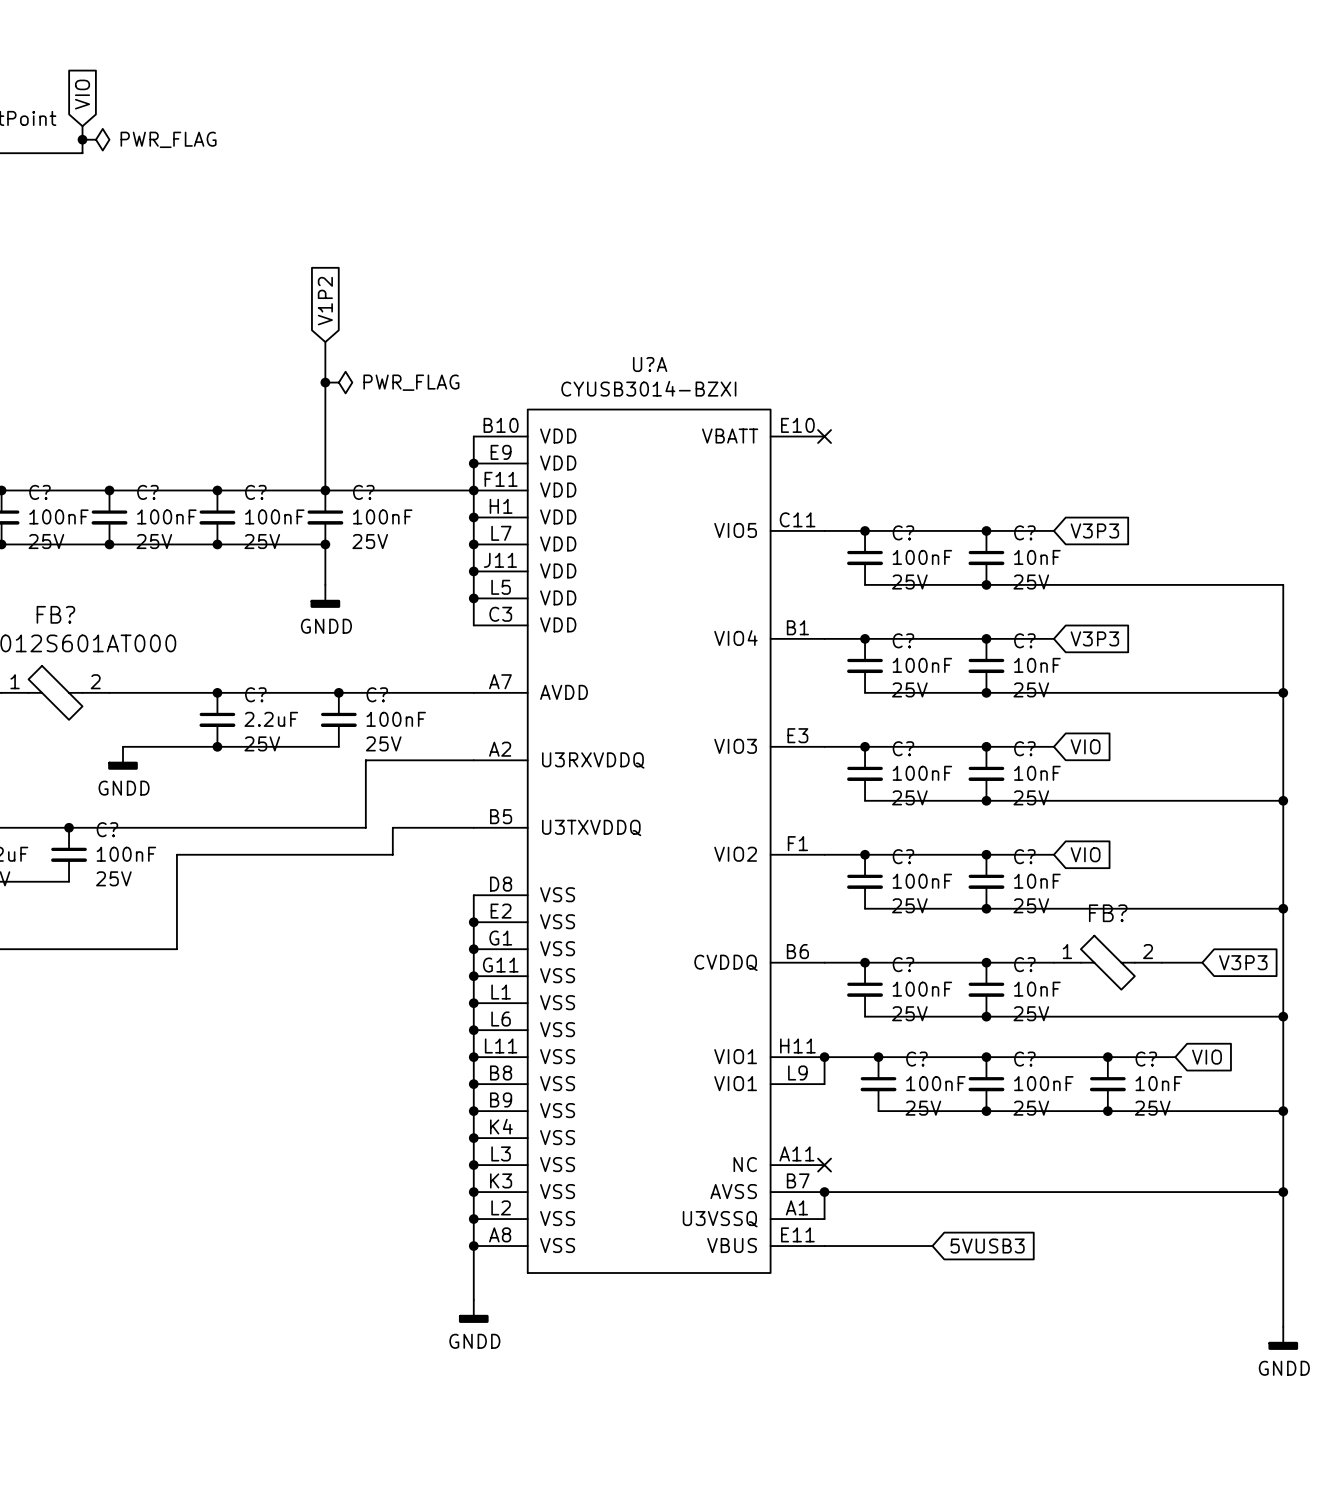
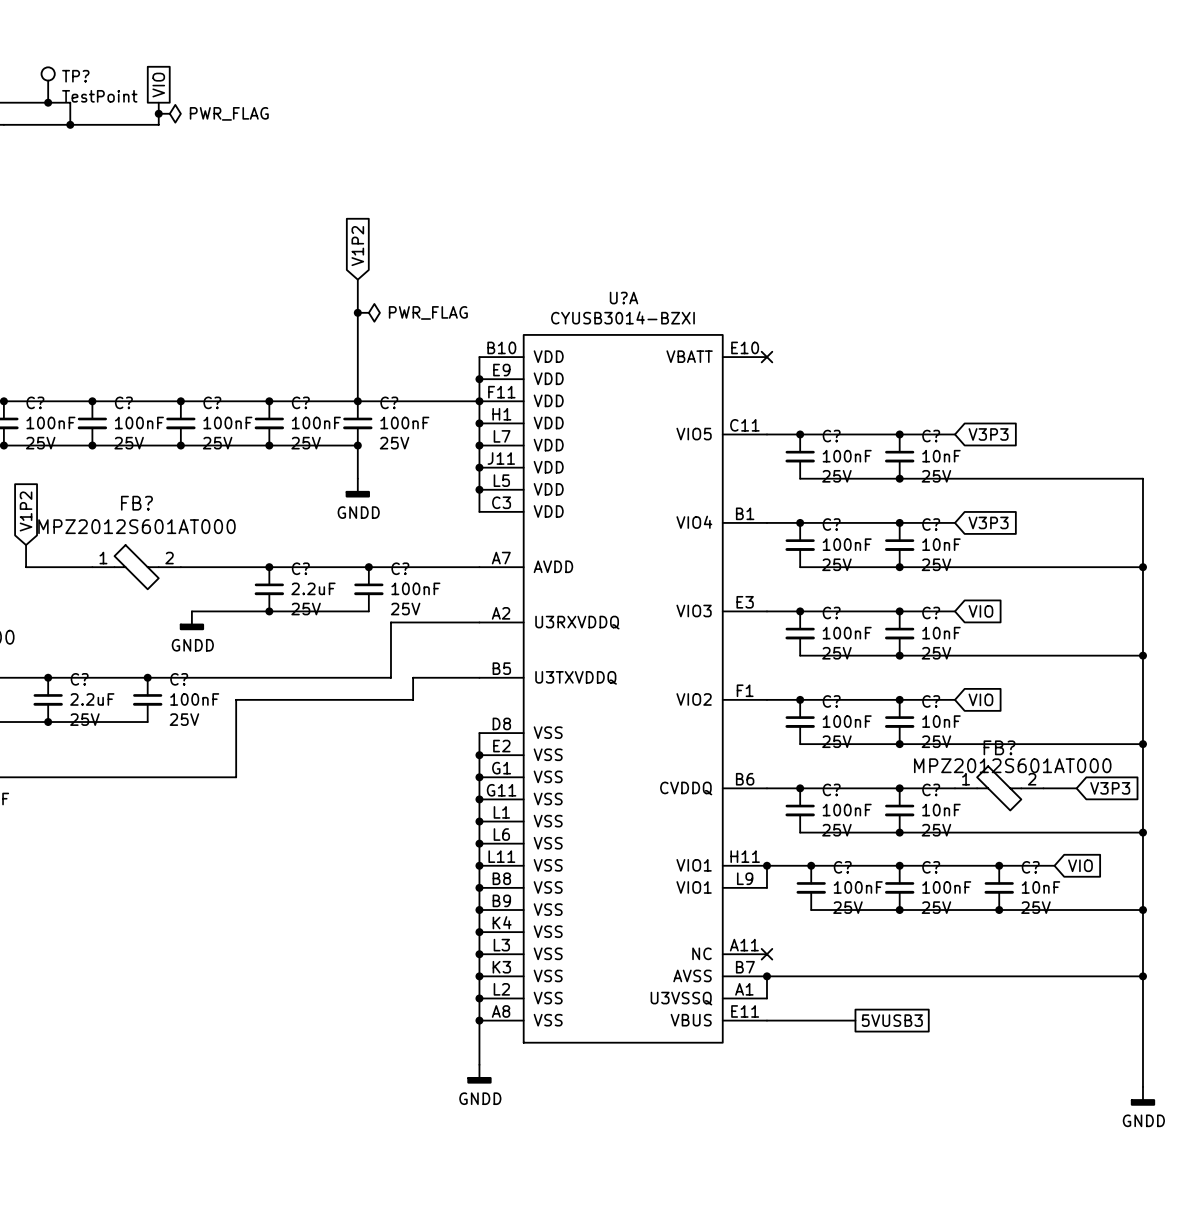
global label shape: input (82, 94) -> passive (158, 85)
FB? text: none -> MPZ2012S601AT000 (1012, 765)
global label shape: input (987, 1246) -> passive (892, 1020)

